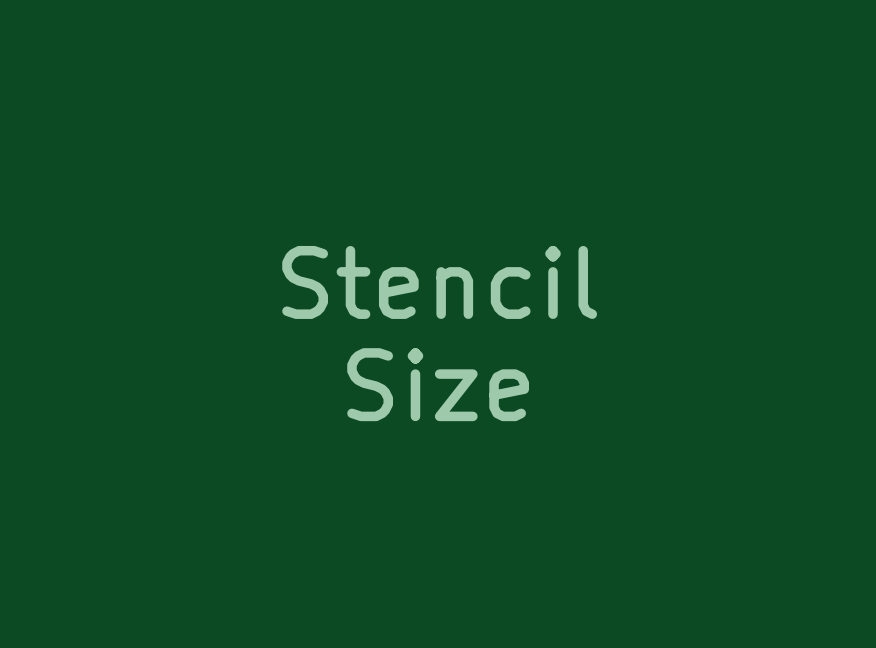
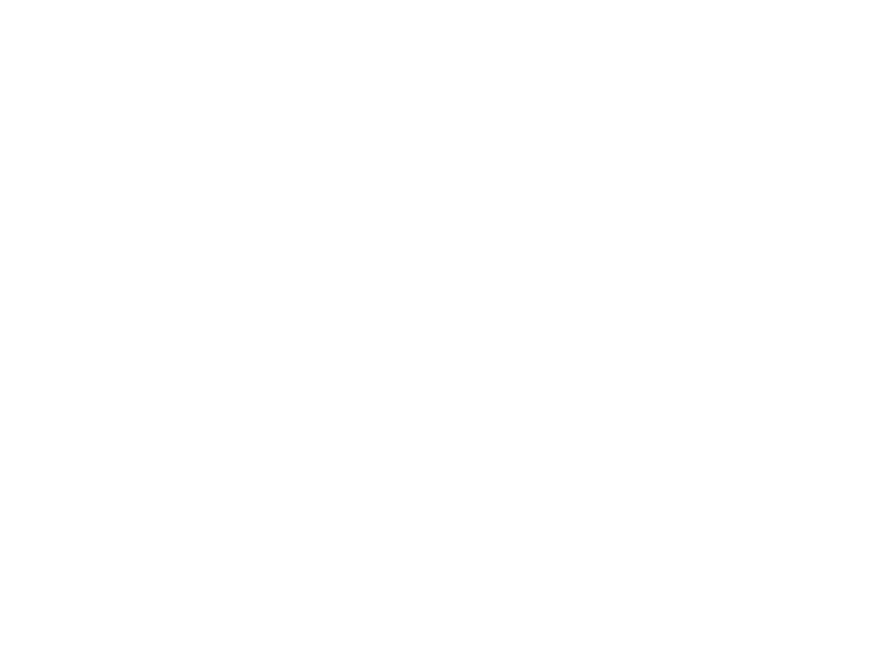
text: Stencil (439, 282) -> none
text: Size (438, 384) -> none

